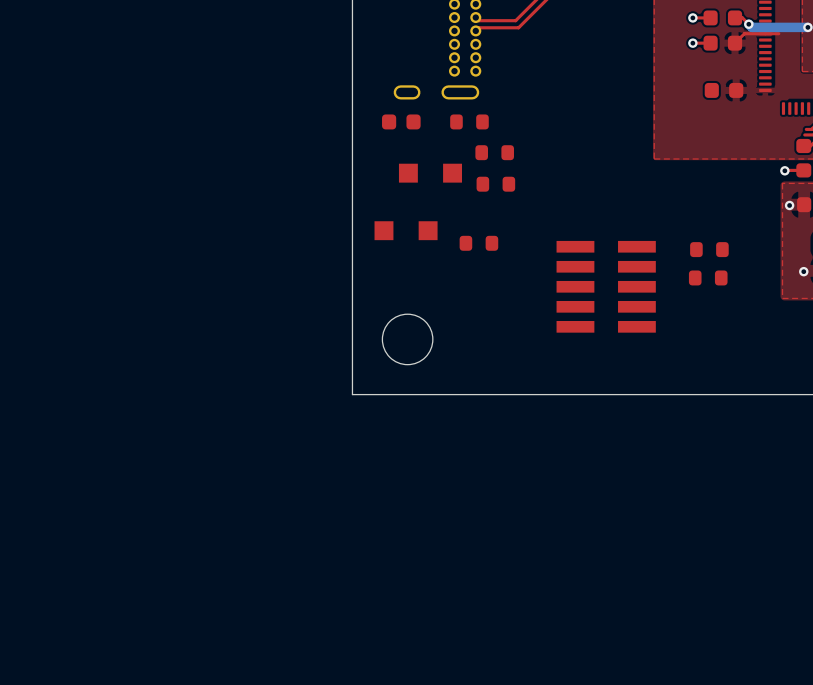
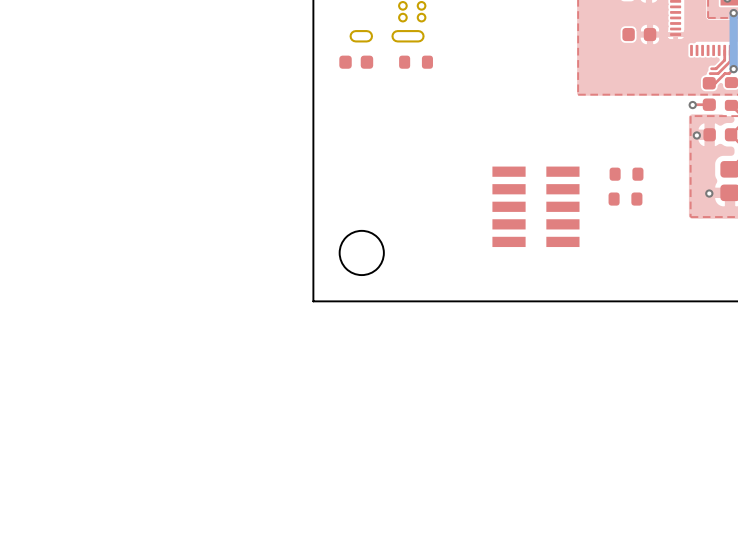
part: (494, 152) -> none
part: (430, 173) -> none
part: (495, 184) -> none
part: (406, 230) -> none
part: (478, 243) -> none

